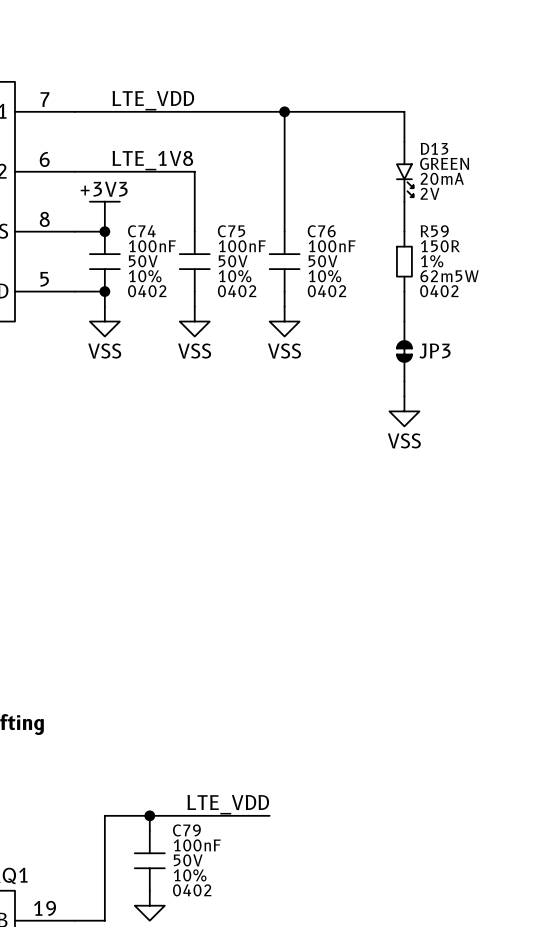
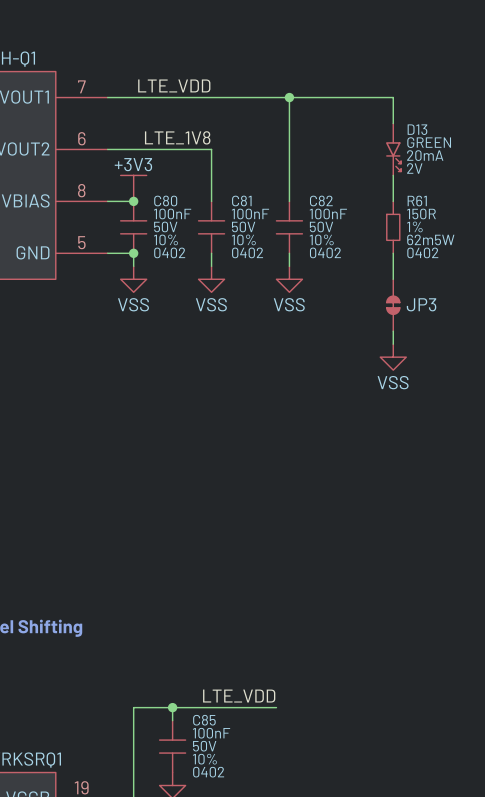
C74 name: C74 (141, 231) -> C80 (165, 201)
C75 name: C75 (231, 231) -> C81 (241, 200)
C76 name: C76 (321, 231) -> C82 (321, 200)
R59 name: R59 (434, 231) -> R61 (417, 200)
C79 name: C79 (186, 830) -> C85 (204, 720)

